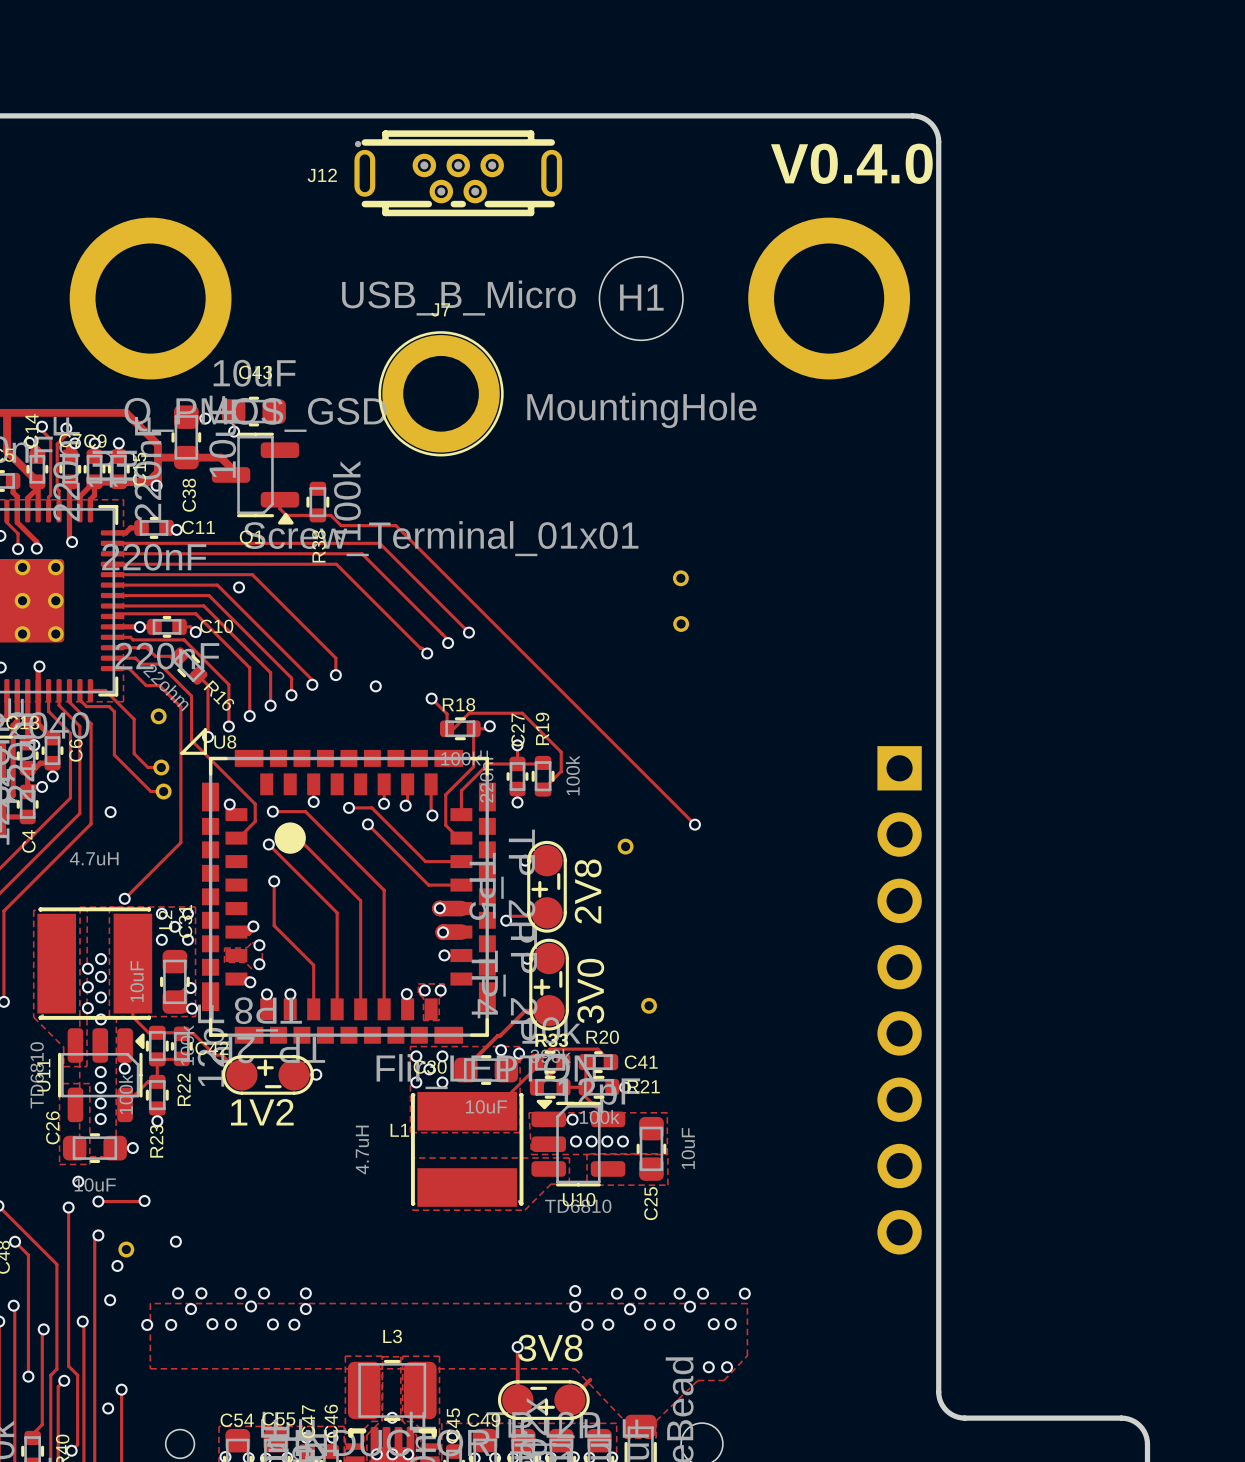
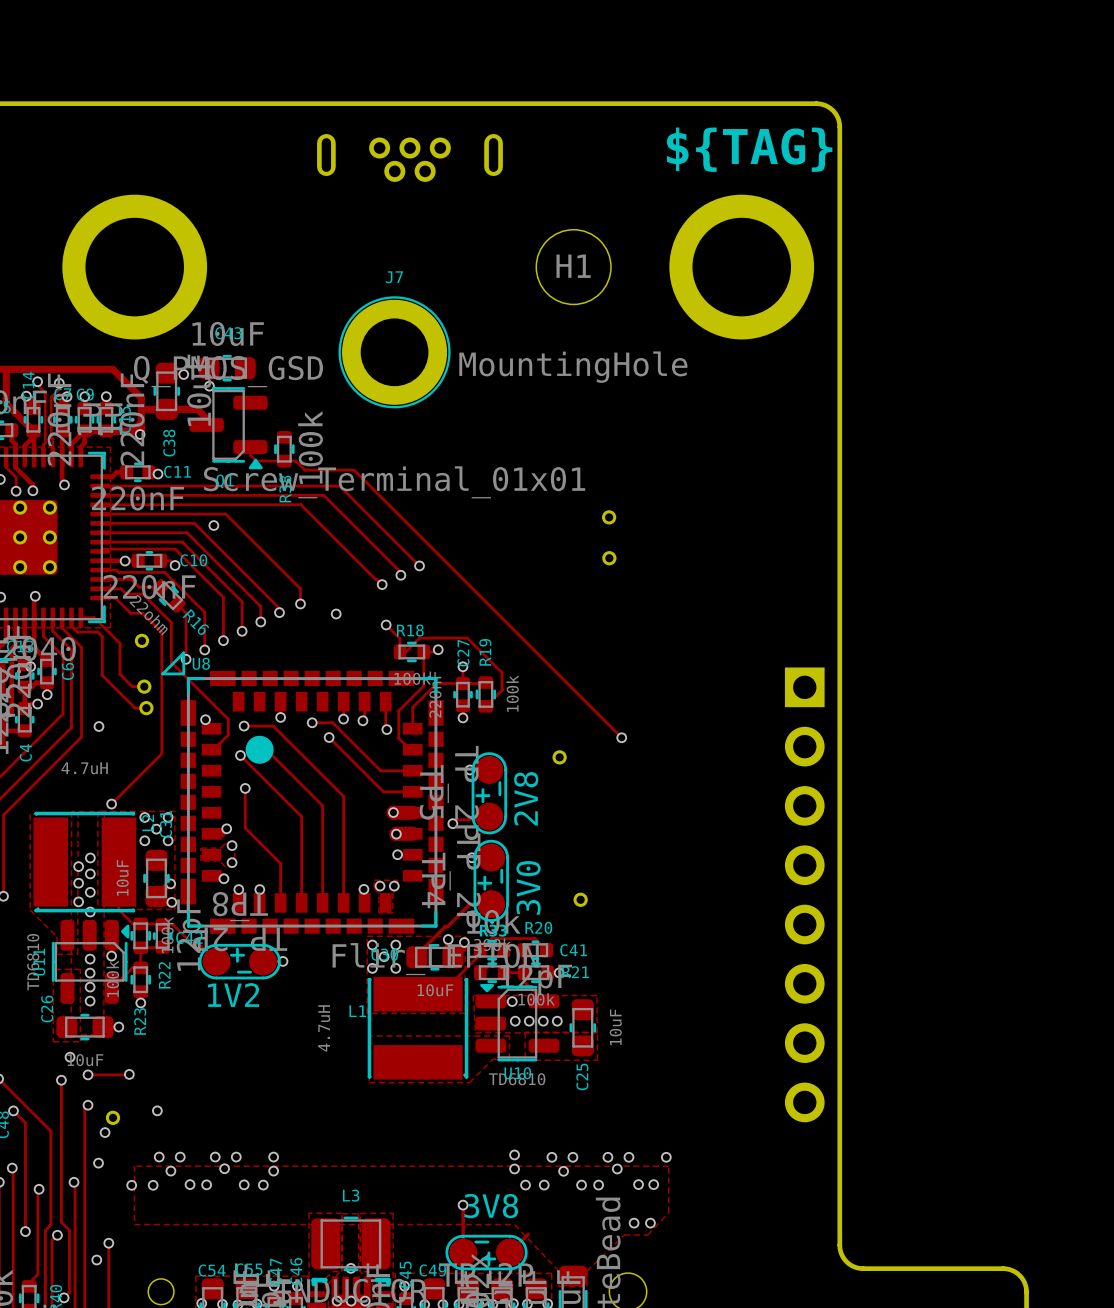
text: V0.4.0 (851, 163) -> ${TAG} (749, 149)
J12 side: top (458, 173) -> bottom (409, 157)

